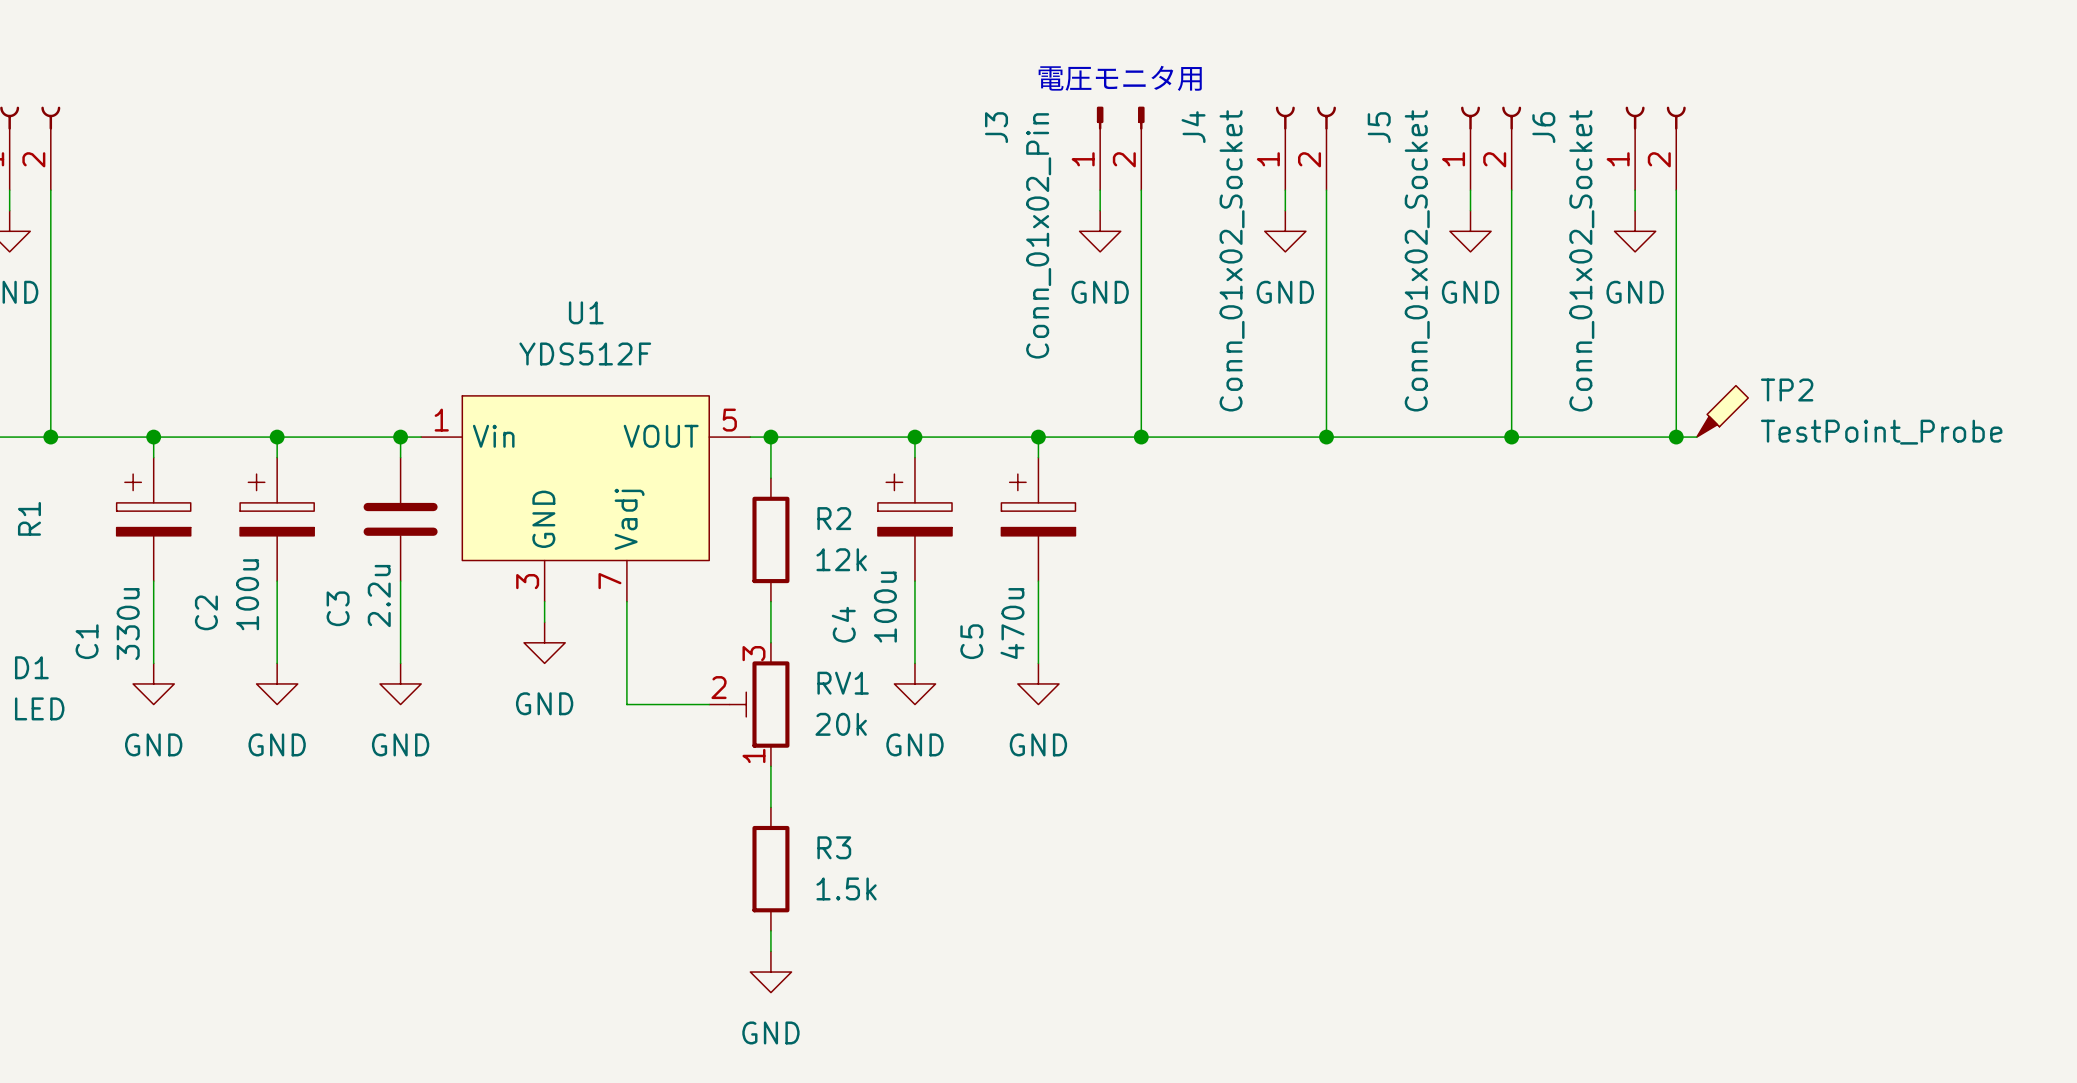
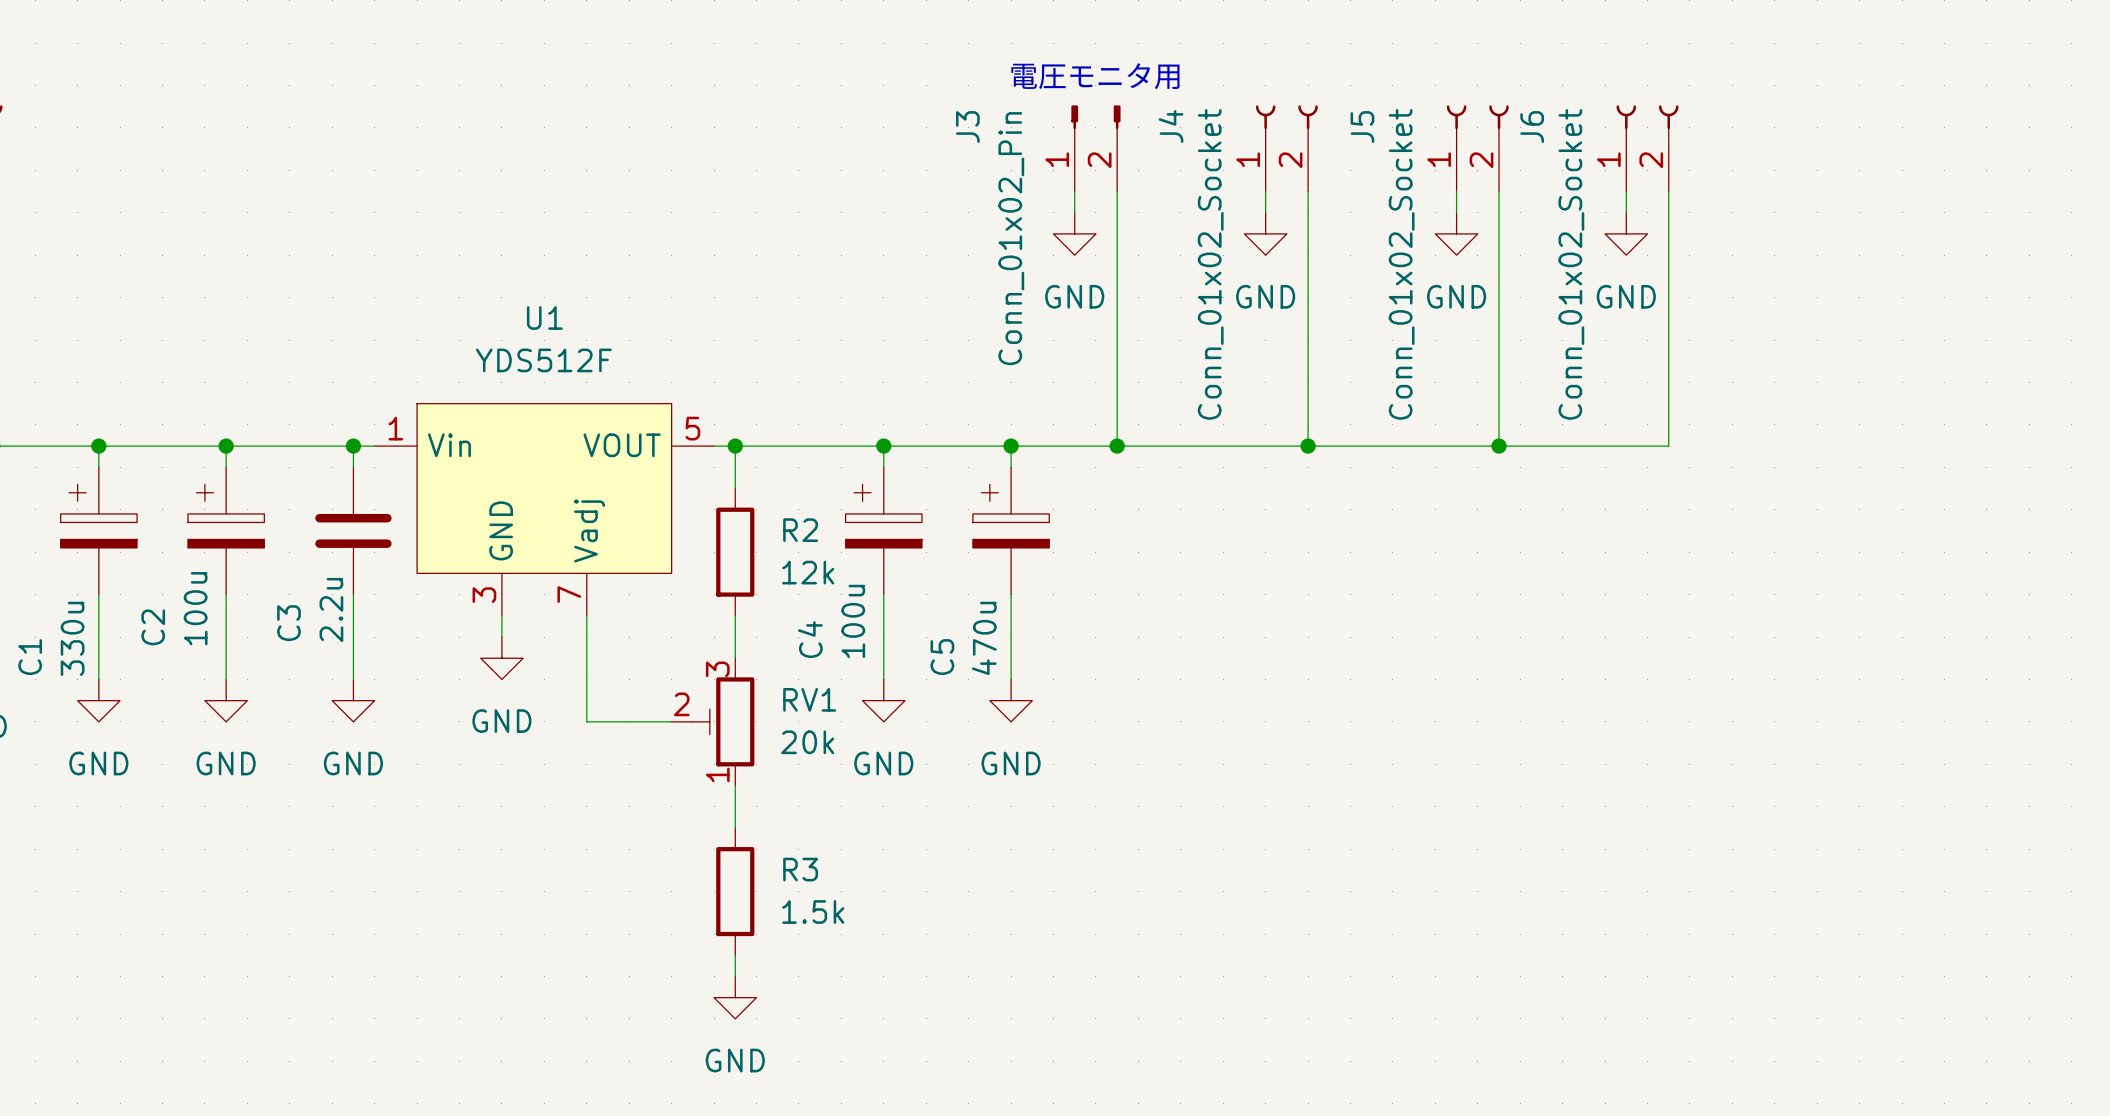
TP2: TestPoint_Probe (1722, 411) -> none
wire: (1676, 437) (1696, 437) -> none
junction: (1676, 437) -> none

